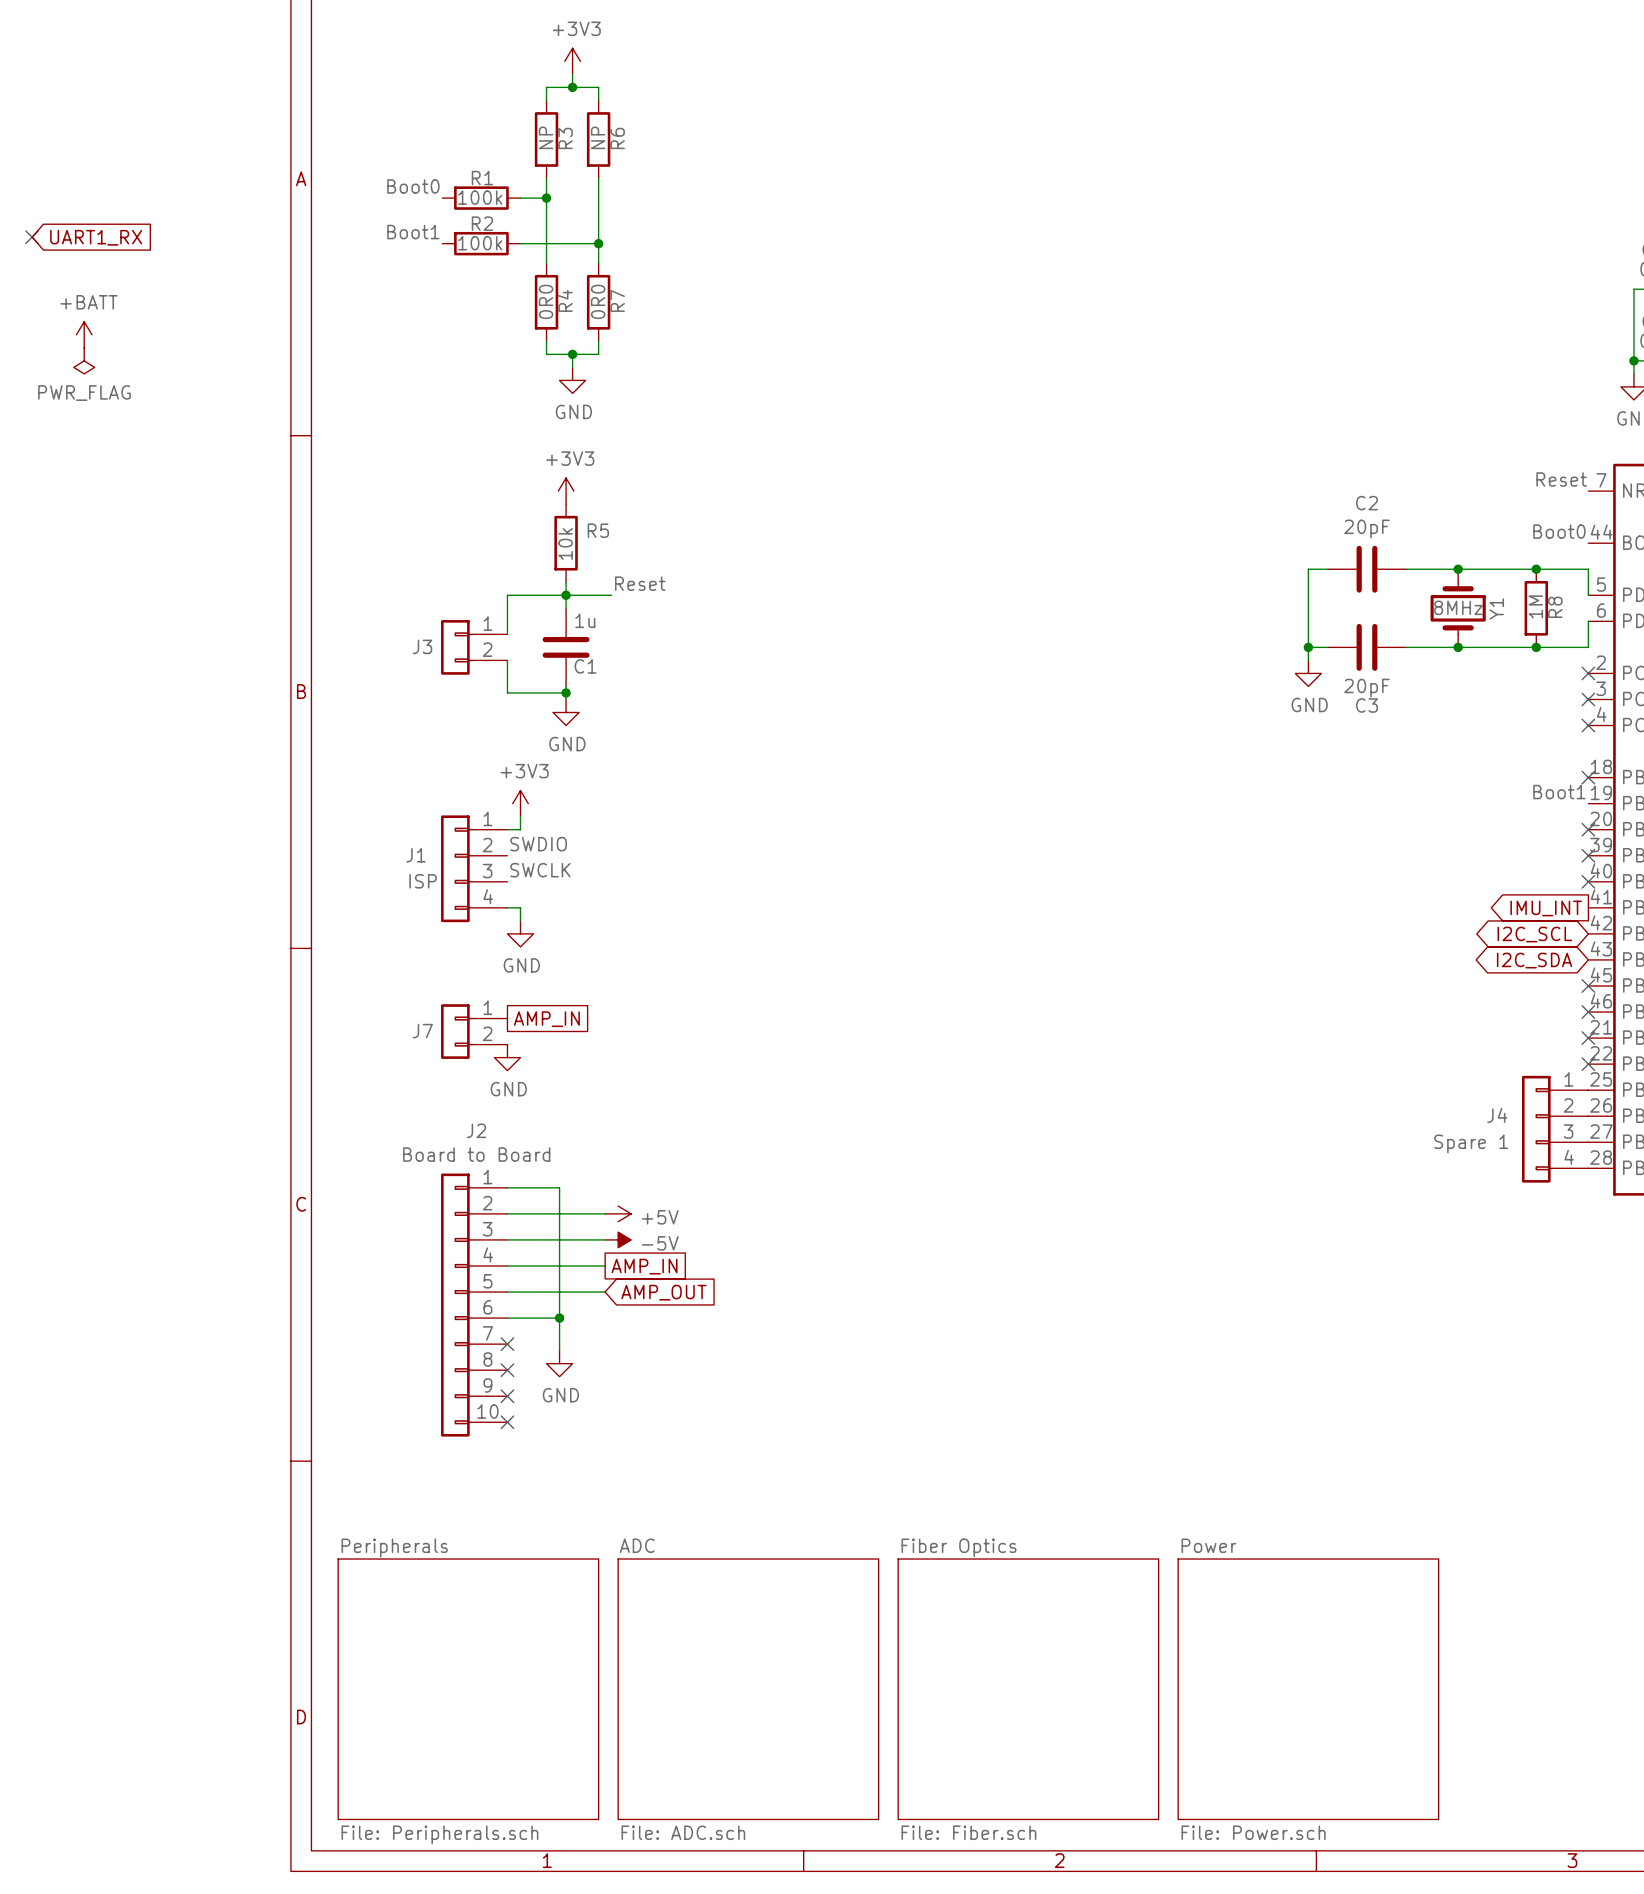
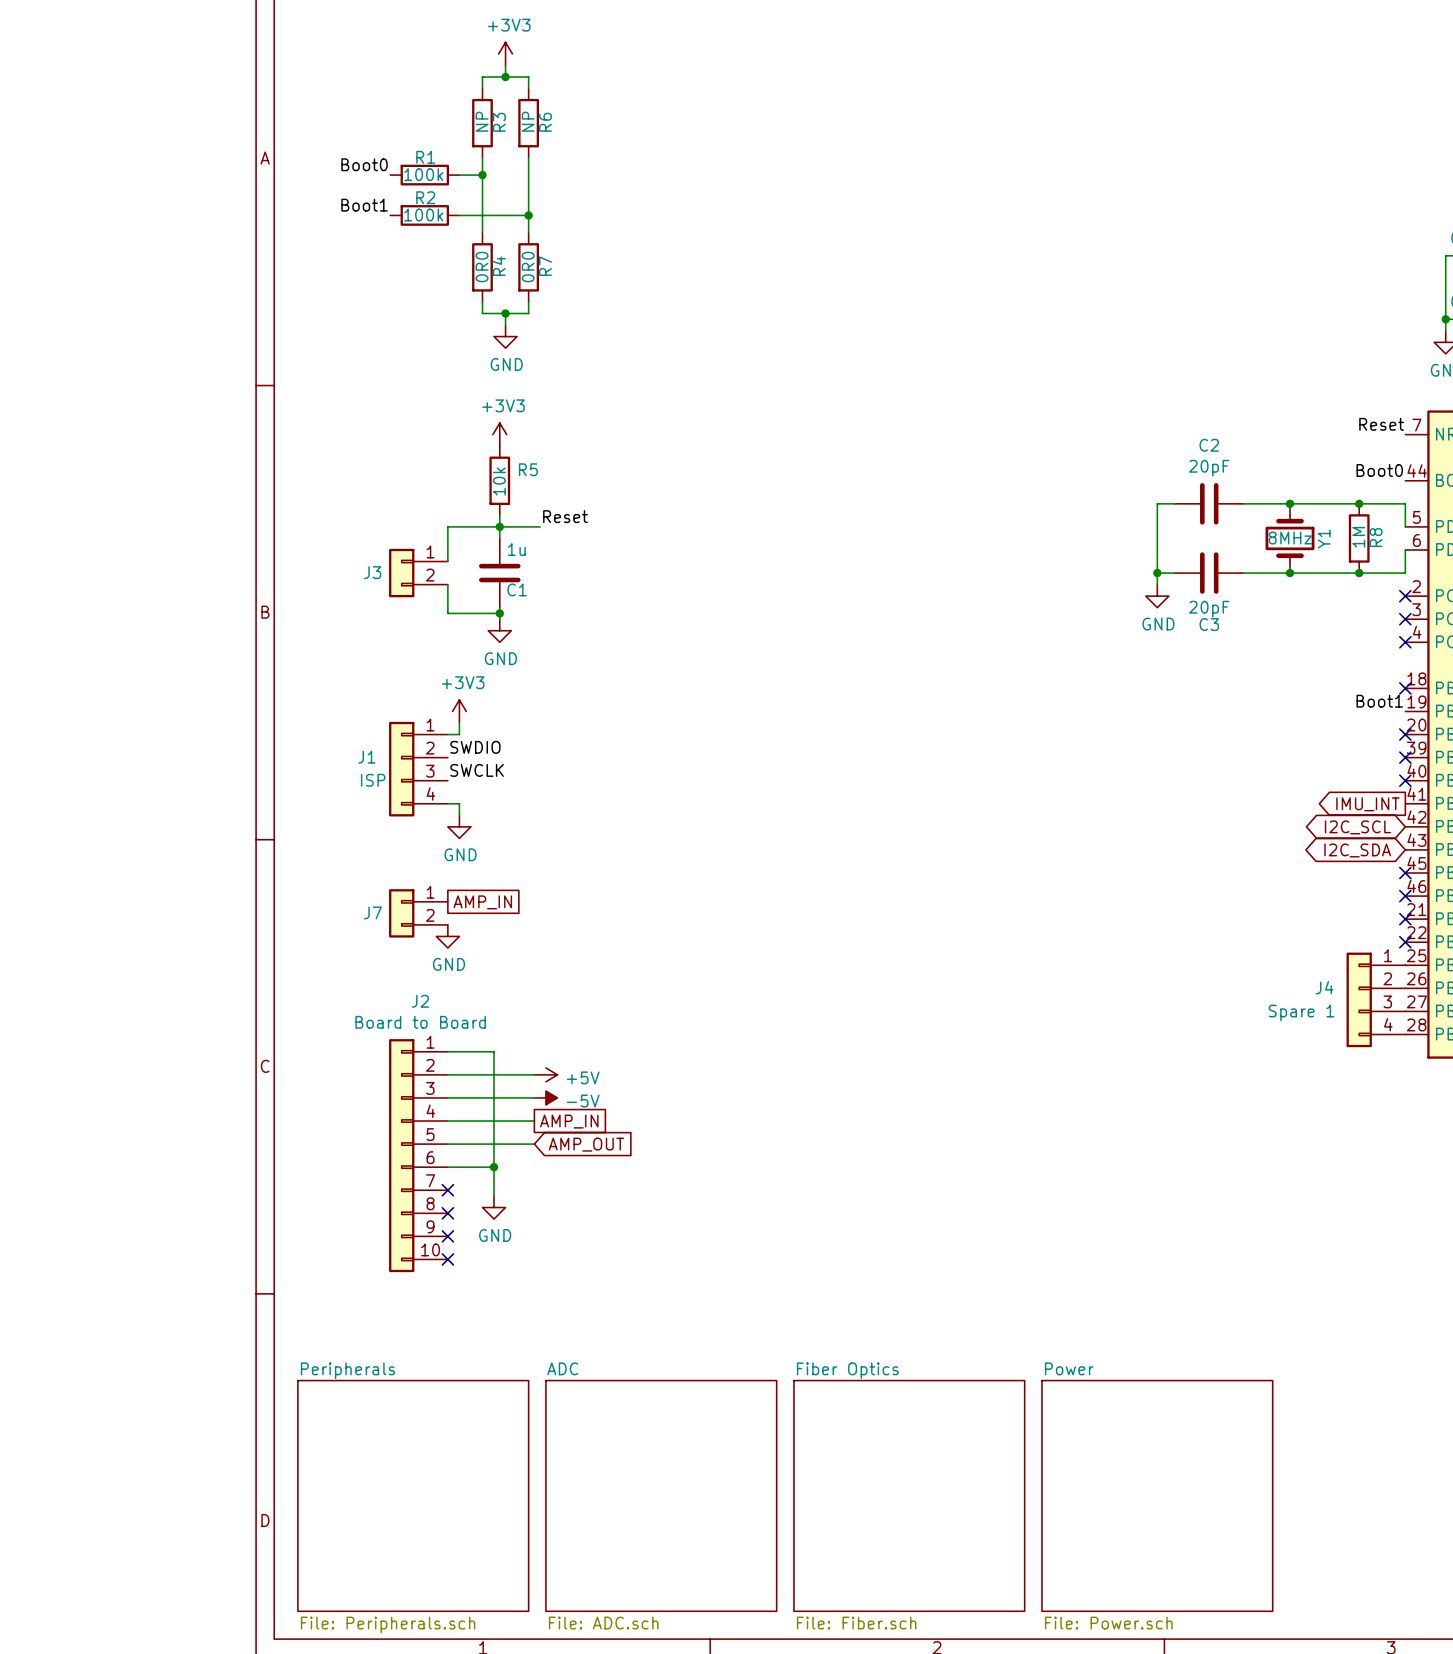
no-connect mark: (32, 237) -> none
global label: UART1_RX (96, 237) -> none
power symbol: +BATT (84, 334) -> none
power symbol: PWR_FLAG (84, 360) -> none

